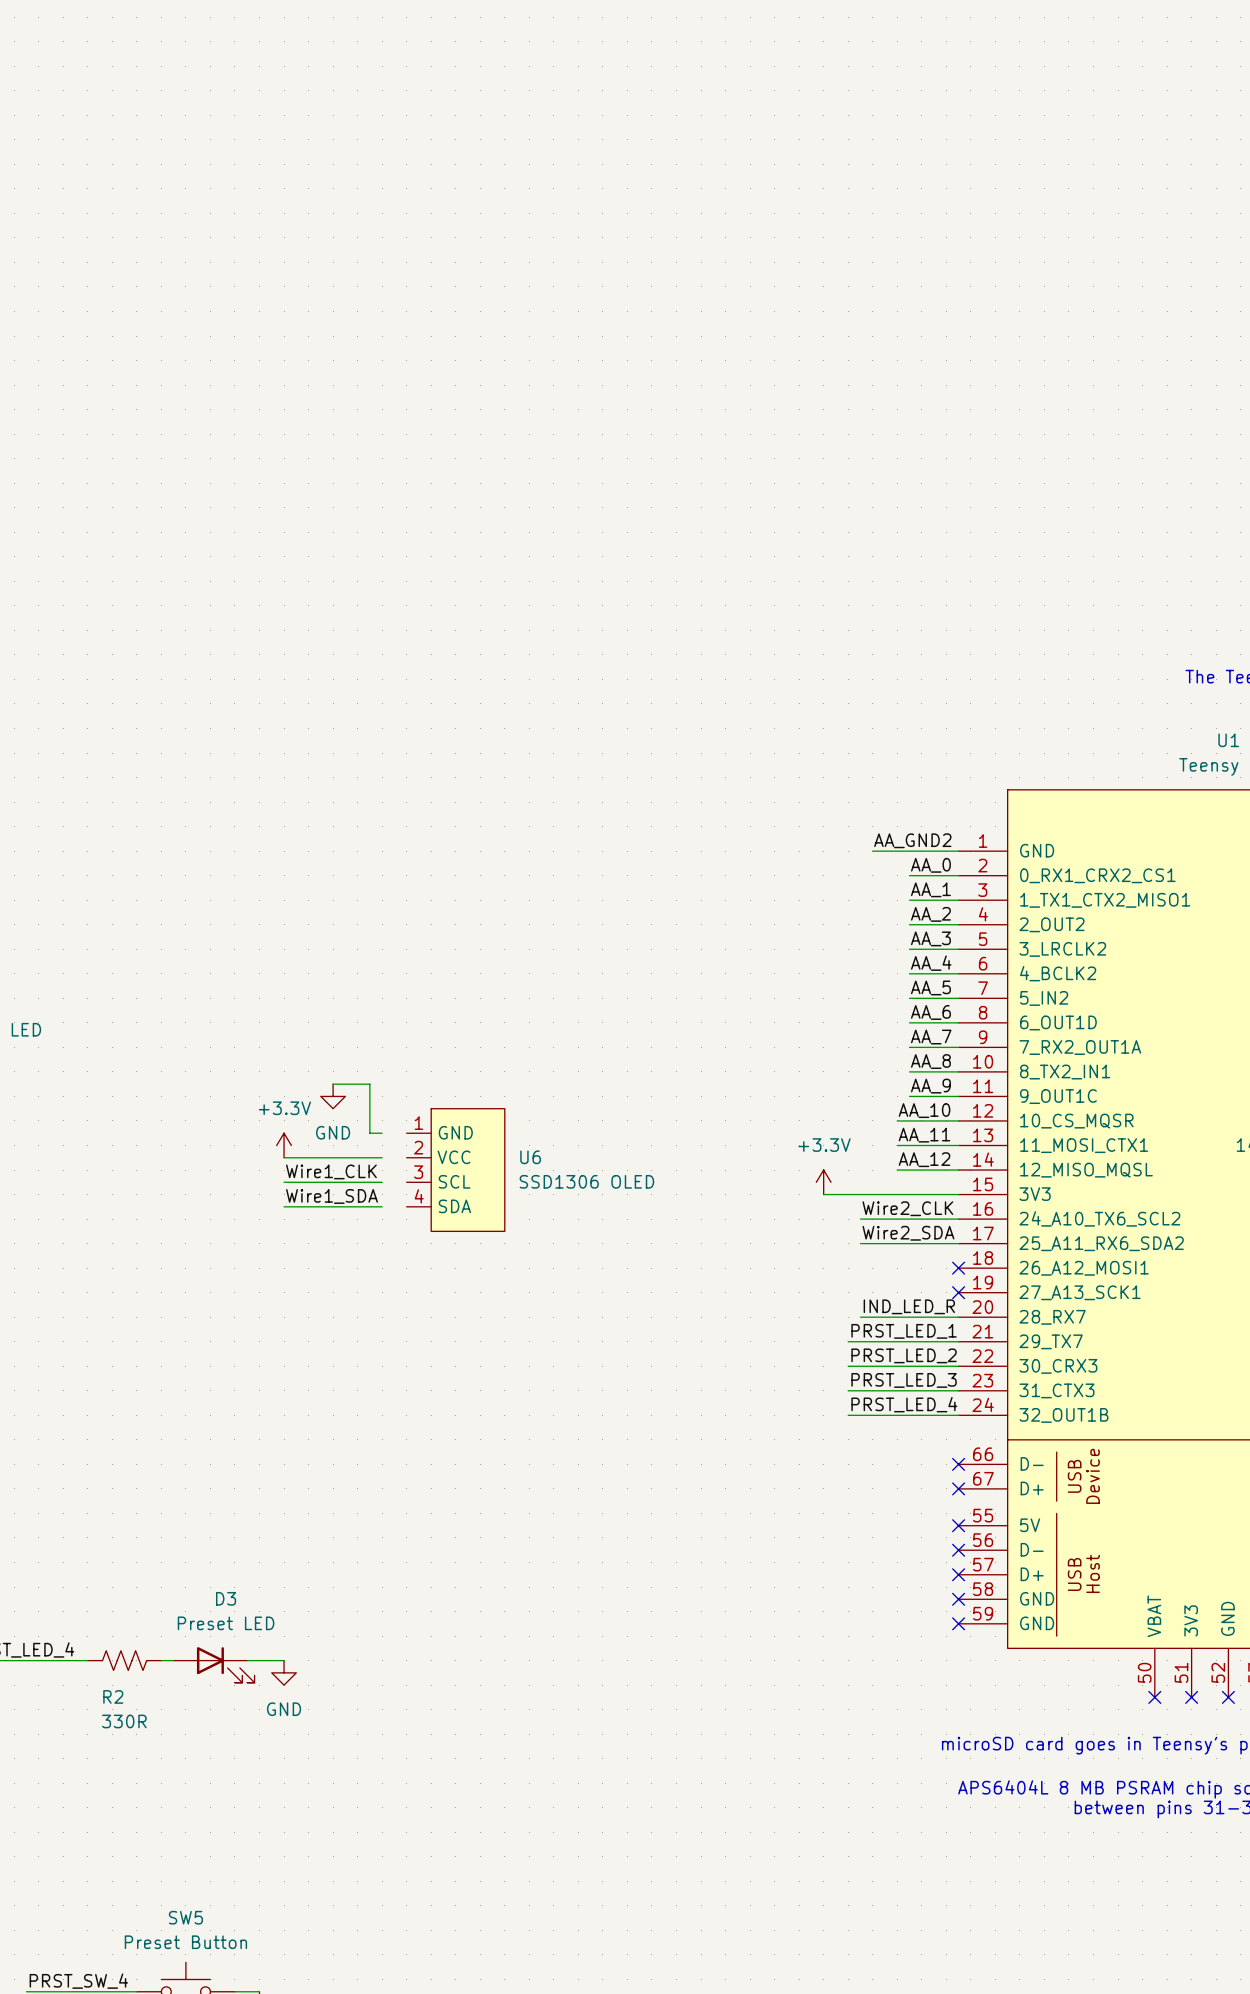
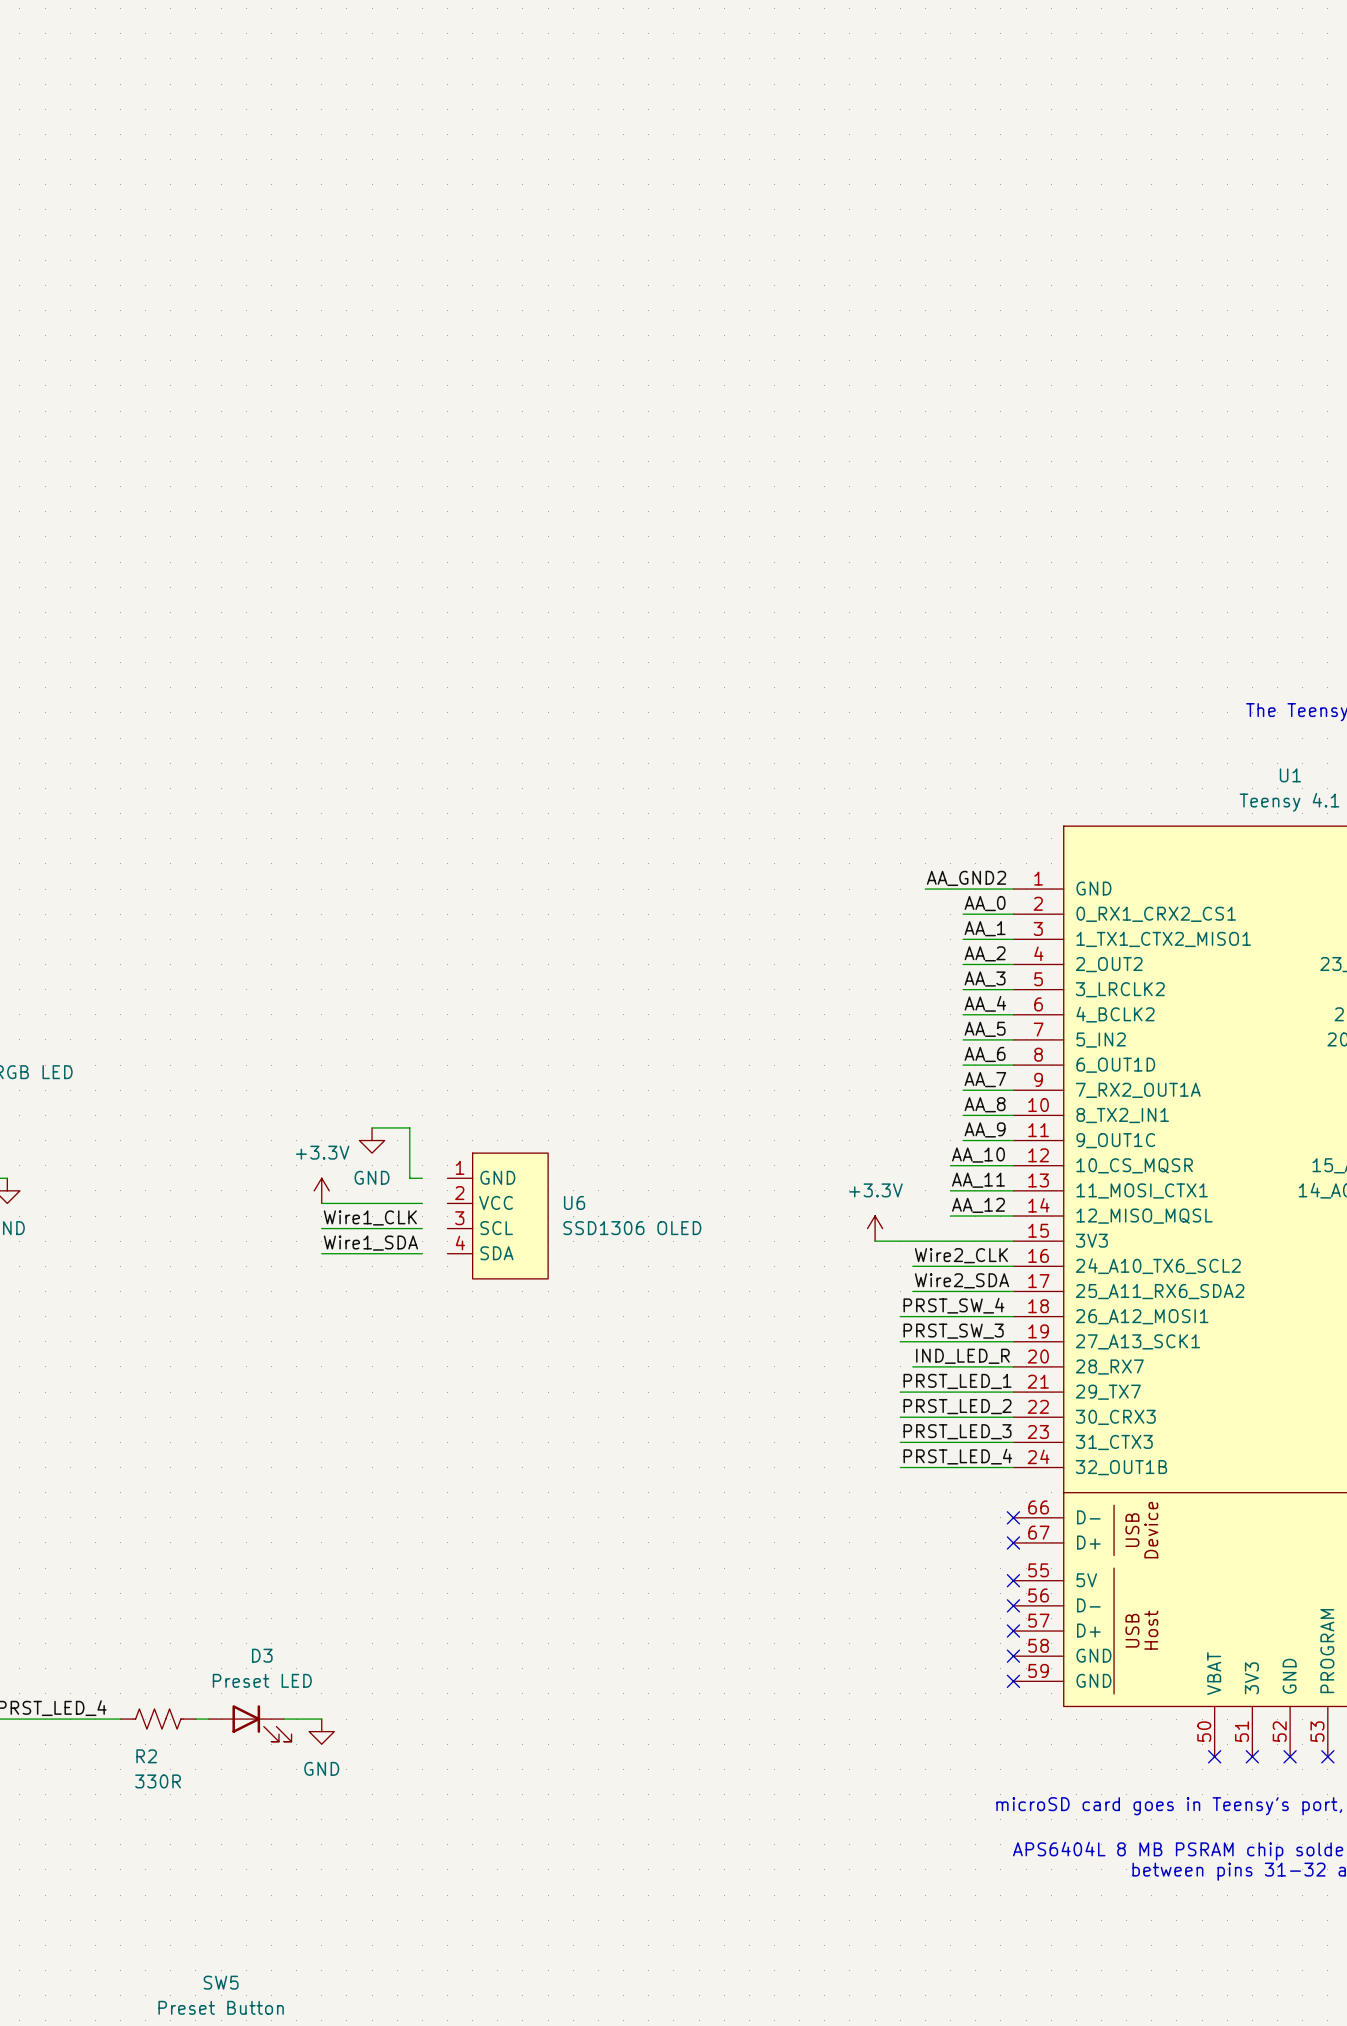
label: none -> PRST_SW_4 (953, 1305)
wire: none -> (900, 1316) (1013, 1316)
no-connect mark: (958, 1268) -> none
label: none -> PRST_SW_3 (953, 1331)
wire: none -> (900, 1341) (1013, 1341)
no-connect mark: (958, 1292) -> none

